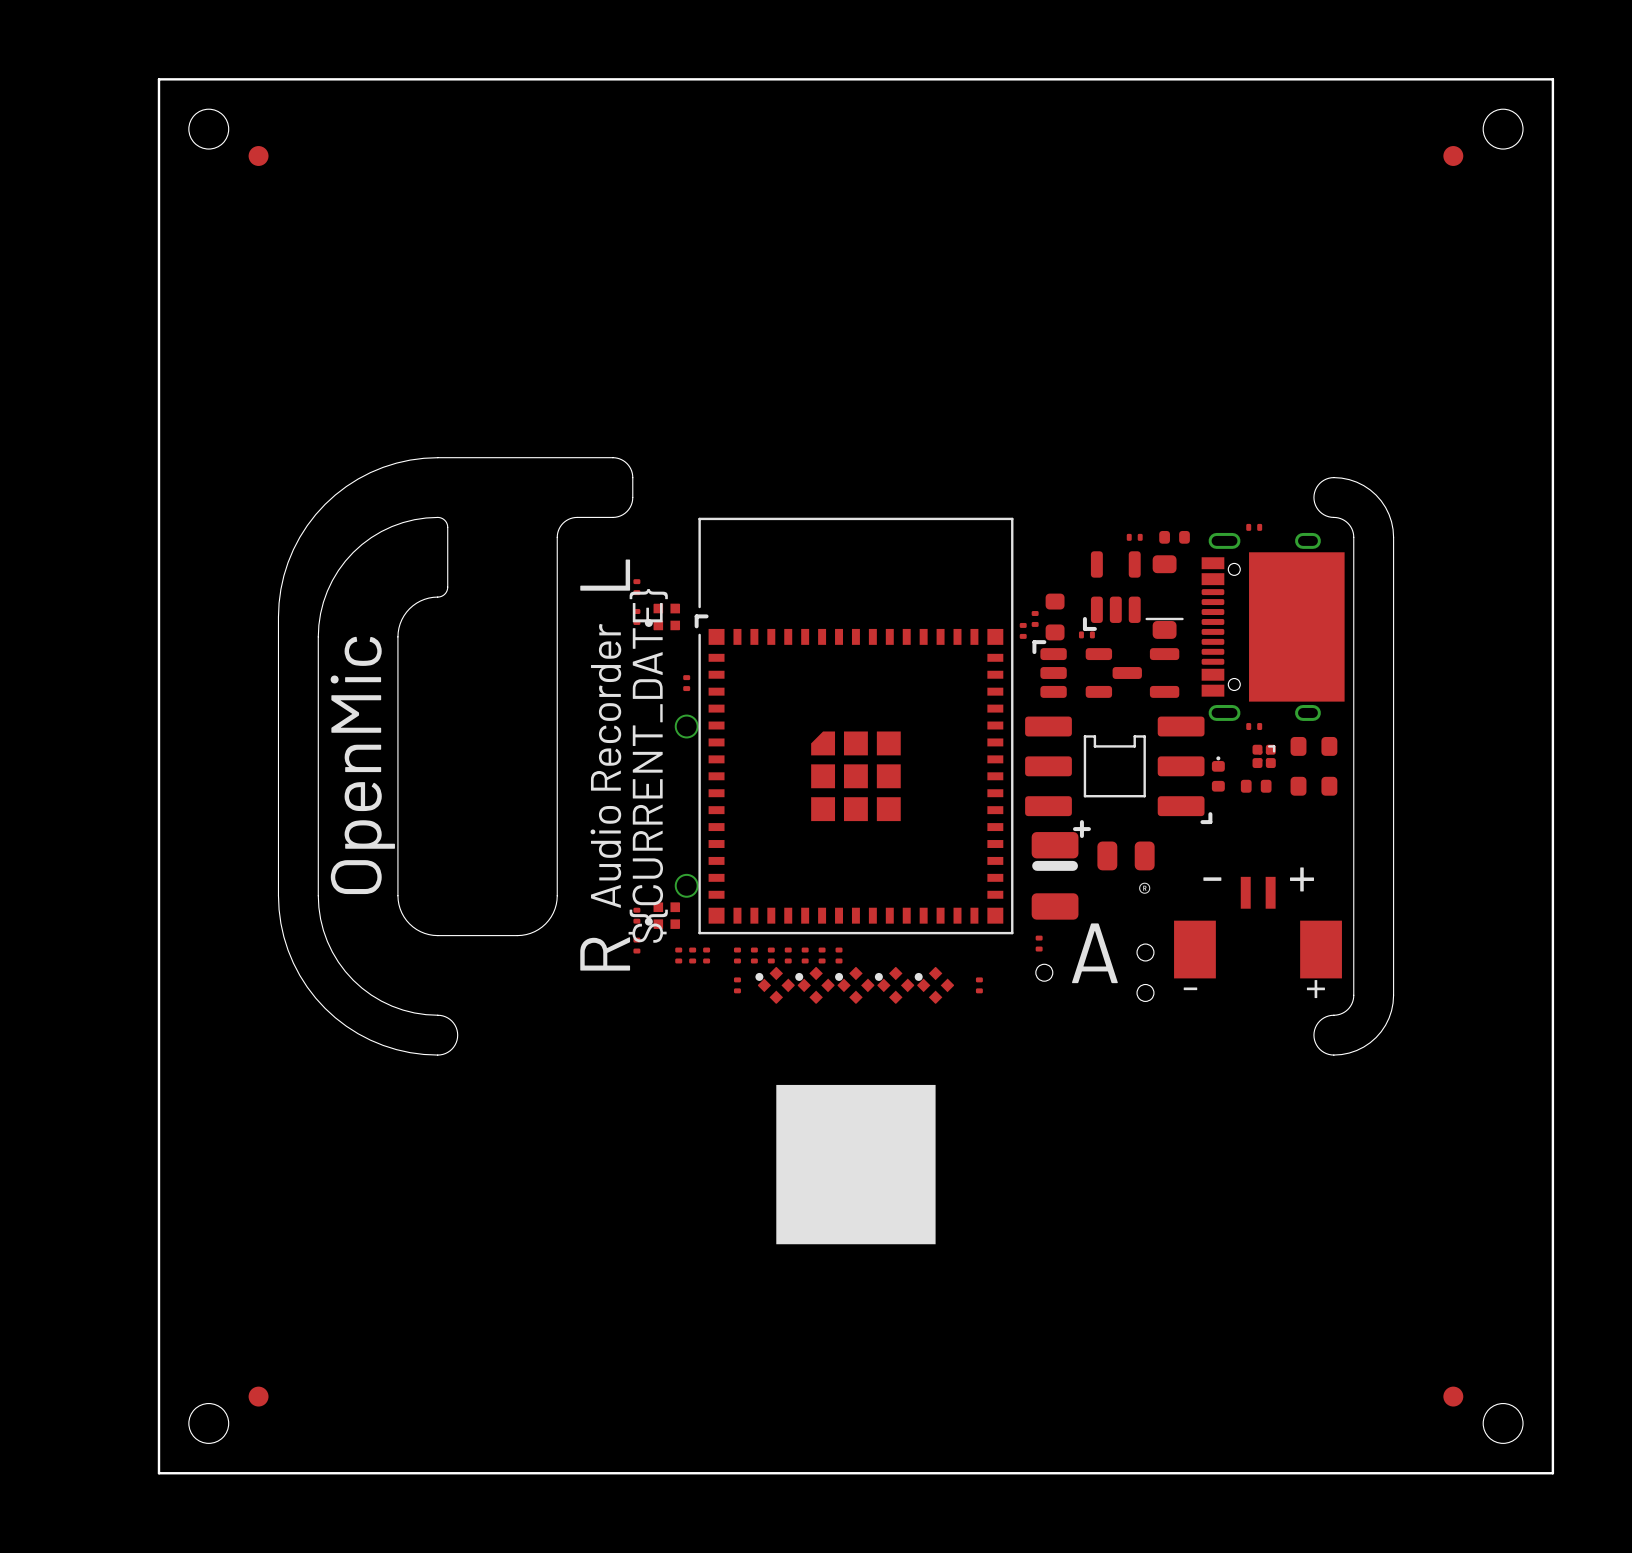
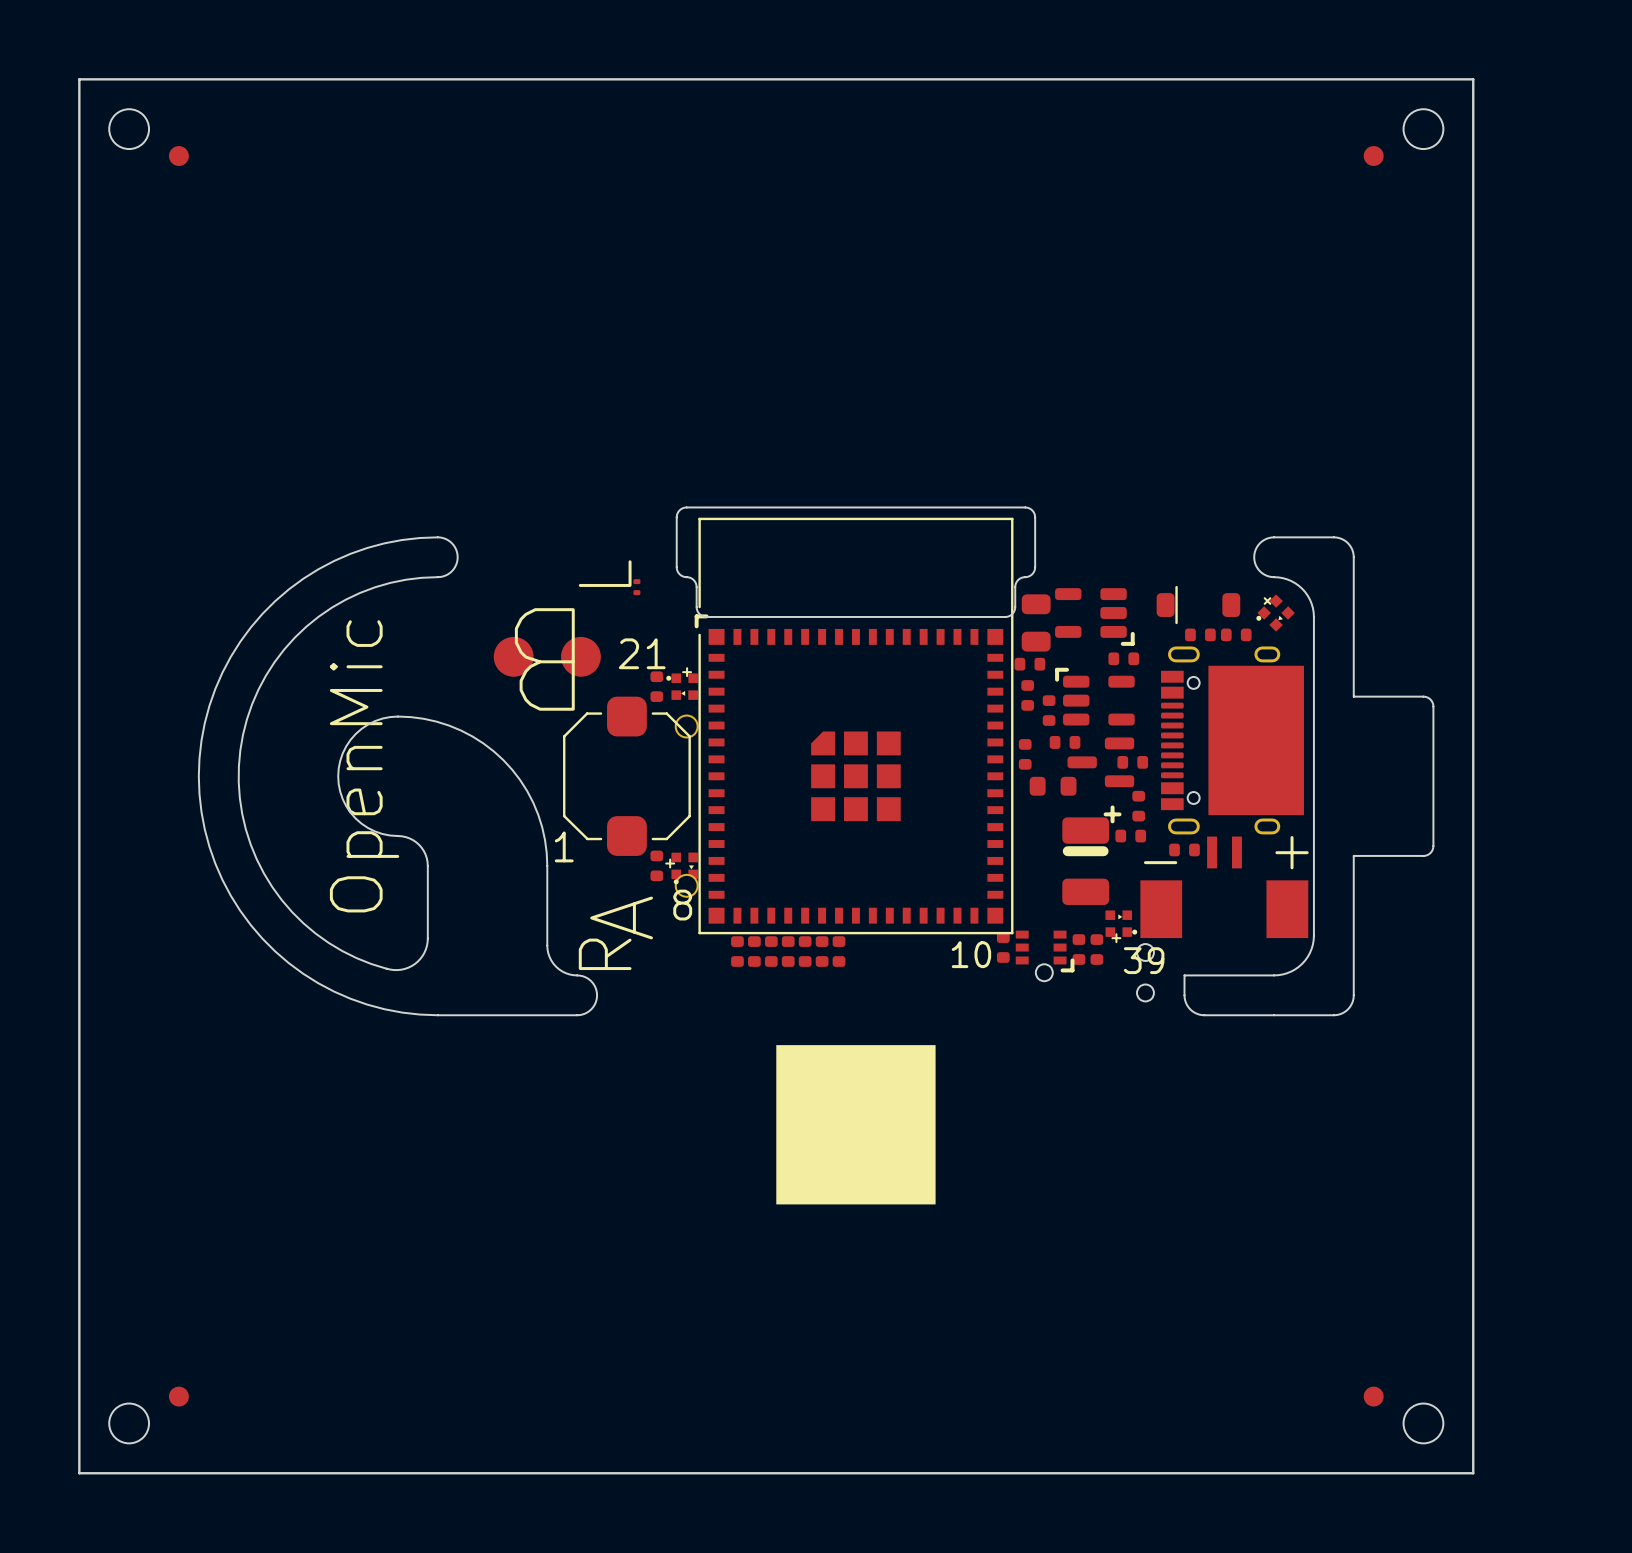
board edge: (437, 457) (615, 457) (626, 463) (632, 477) (632, 502) (624, 513) (615, 517) (570, 518) (563, 523) (557, 532) (557, 900) (548, 920) (530, 933) (517, 935) (428, 934) (409, 923) (398, 904) (398, 632) (401, 619) (412, 605) (424, 599) (441, 596) (446, 590) (446, 522) (439, 517) (414, 519) (392, 526) (371, 537) (345, 561) (332, 580) (323, 602) (318, 636) (318, 895) (323, 930) (332, 952) (345, 971) (371, 995) (403, 1010) (442, 1015) (451, 1021) (457, 1030) (456, 1042) (449, 1050) (437, 1055) (410, 1052) (370, 1040) (346, 1026) (325, 1008) (307, 987) (288, 950) (280, 923) (278, 895) (278, 616) (280, 589) (288, 562) (299, 537) (315, 514) (346, 486) (370, 472) (396, 463) (437, 457) -> (386, 968) (356, 958) (328, 942) (292, 912) (272, 887) (256, 859) (245, 829) (239, 798) (240, 750) (246, 719) (258, 689) (274, 662) (294, 637) (318, 616) (360, 592) (390, 582) (440, 576) (449, 573) (456, 564) (457, 552) (451, 543) (440, 537) (419, 538) (384, 543) (334, 561) (288, 589) (250, 627) (222, 672) (204, 723) (198, 776) (201, 811) (209, 846) (230, 895) (262, 938) (303, 973) (350, 998) (384, 1009) (419, 1014) (577, 1015) (584, 1013) (591, 1009) (596, 997) (595, 987) (589, 979) (562, 971) (553, 963) (549, 956) (547, 945) (547, 865) (545, 839) (533, 802) (520, 780) (493, 751) (472, 736) (449, 725) (410, 717) (382, 718) (361, 728) (346, 746) (338, 768) (338, 784) (342, 799) (355, 818) (375, 831) (412, 840) (421, 847) (426, 858) (427, 938) (425, 949) (417, 961) (408, 967) (397, 970) (386, 968)
board edge: none -> (686, 507) (1026, 507) (1032, 510) (1035, 516) (1035, 568) (1031, 575) (1021, 577) (1016, 582) (1014, 609) (1011, 614) (1006, 616) (705, 616) (699, 614) (696, 609) (695, 582) (690, 577) (680, 575) (676, 568) (676, 516) (680, 509) (686, 507)
part: (1254, 527) -> none
part footprint: [1201, 532, 1345, 721] -> [1256, 594, 1295, 632]
part: (1134, 537) -> none
part: (1174, 537) -> none
board edge: (1353, 557) (1353, 535) (1349, 524) (1340, 518) (1323, 514) (1318, 509) (1314, 502) (1314, 494) (1316, 487) (1321, 481) (1328, 478) (1341, 478) (1356, 482) (1376, 495) (1389, 514) (1393, 537) (1393, 1003) (1389, 1018) (1376, 1037) (1363, 1047) (1349, 1053) (1328, 1054) (1319, 1049) (1315, 1042) (1314, 1032) (1318, 1023) (1326, 1016) (1333, 1015) -> (1353, 557) (1347, 543) (1333, 537) (1268, 538) (1260, 543) (1254, 554) (1255, 564) (1261, 573) (1268, 576) (1287, 579) (1302, 588) (1309, 599) (1313, 612) (1313, 935) (1311, 948) (1302, 963) (1282, 974) (1184, 975) (1185, 1001) (1192, 1010) (1199, 1014) (1333, 1015)
part: (1111, 591) -> none
part rotation: 0° (1164, 597) -> 90° clockwise (1198, 605)
part footprint: [1031, 611, 1039, 627] -> [1021, 594, 1051, 652]
part: (636, 616) -> none
part: (662, 616) -> none
part: (1055, 616) -> none
part: none -> (1094, 616)
part: (1023, 630) -> none
part: (1086, 634) -> none
part: none -> (1200, 634)
part: none -> (1236, 634)
text: none -> 21 (642, 653)
part: none -> (547, 656)
part: none -> (1123, 658)
part: none -> (1029, 664)
part: (1072, 669) -> none
part position: (1145, 672) -> (1100, 762)
part footprint: [683, 675, 691, 692] -> [666, 667, 699, 700]
part: none -> (656, 686)
part: none -> (1027, 695)
part: none -> (1094, 696)
board edge: (1353, 696) (1353, 855) -> (1353, 696) (1424, 696) (1430, 699) (1433, 706) (1432, 850) (1423, 855) (1353, 855)
part: none -> (1049, 710)
part: (1254, 726) -> none
part: none -> (1232, 740)
part: none -> (1065, 742)
part: (1313, 746) -> none
part: none -> (1025, 754)
part: (1264, 756) -> none
part: none -> (1132, 762)
text: Audio Recorder (605, 765) -> none
text: ${CURRENT_DATE} (648, 765) -> none
part: (1118, 770) -> none
part: (1218, 774) -> none
part: none -> (626, 776)
part position: (855, 776) -> (776, 776)
part: none -> (1053, 786)
part: (1256, 786) -> none
part: (1313, 786) -> none
part: none -> (1138, 806)
part: none -> (1130, 836)
text: none -> 1 (564, 846)
part: none -> (1184, 849)
part: none -> (1091, 855)
part: (1126, 855) -> none
part: none -> (656, 865)
part: none -> (681, 868)
part: (1061, 869) -> none
text position: - (1212, 879) -> - (1160, 862)
text position: + (1301, 879) -> + (1292, 852)
text: ® (1144, 888) -> none
text: none -> 8 (682, 905)
part: (636, 915) -> none
part: (662, 915) -> none
part: none -> (1121, 926)
part footprint: [1035, 935, 1043, 952] -> [1015, 930, 1075, 973]
part: (636, 945) -> none
part footprint: [733, 947, 741, 964] -> [731, 936, 744, 967]
part footprint: [750, 947, 758, 964] -> [748, 936, 761, 967]
part footprint: [767, 947, 775, 964] -> [764, 936, 778, 967]
part footprint: [784, 947, 792, 964] -> [781, 936, 795, 967]
part footprint: [801, 947, 809, 964] -> [798, 936, 812, 967]
part footprint: [818, 947, 826, 964] -> [815, 936, 829, 967]
part footprint: [835, 947, 843, 964] -> [832, 936, 846, 967]
part: none -> (1003, 947)
part: none -> (1078, 949)
part: none -> (1096, 949)
text rotation: 0° (1094, 953) -> 90° counterclockwise (621, 917)
text position: A (1094, 953) -> A (621, 917)
text: none -> 10 (971, 954)
part: (678, 955) -> none
part: (692, 955) -> none
part: (706, 955) -> none
part position: (1258, 956) -> (1224, 915)
text: none -> 39 (1144, 960)
part: (737, 985) -> none
part: (775, 985) -> none
part: (814, 985) -> none
part: (854, 985) -> none
part: (894, 985) -> none
part: (934, 985) -> none
part: (979, 985) -> none
text: - (1190, 988) -> none
text: + (1315, 989) -> none
drawing position: (855, 1164) -> (855, 1124)

